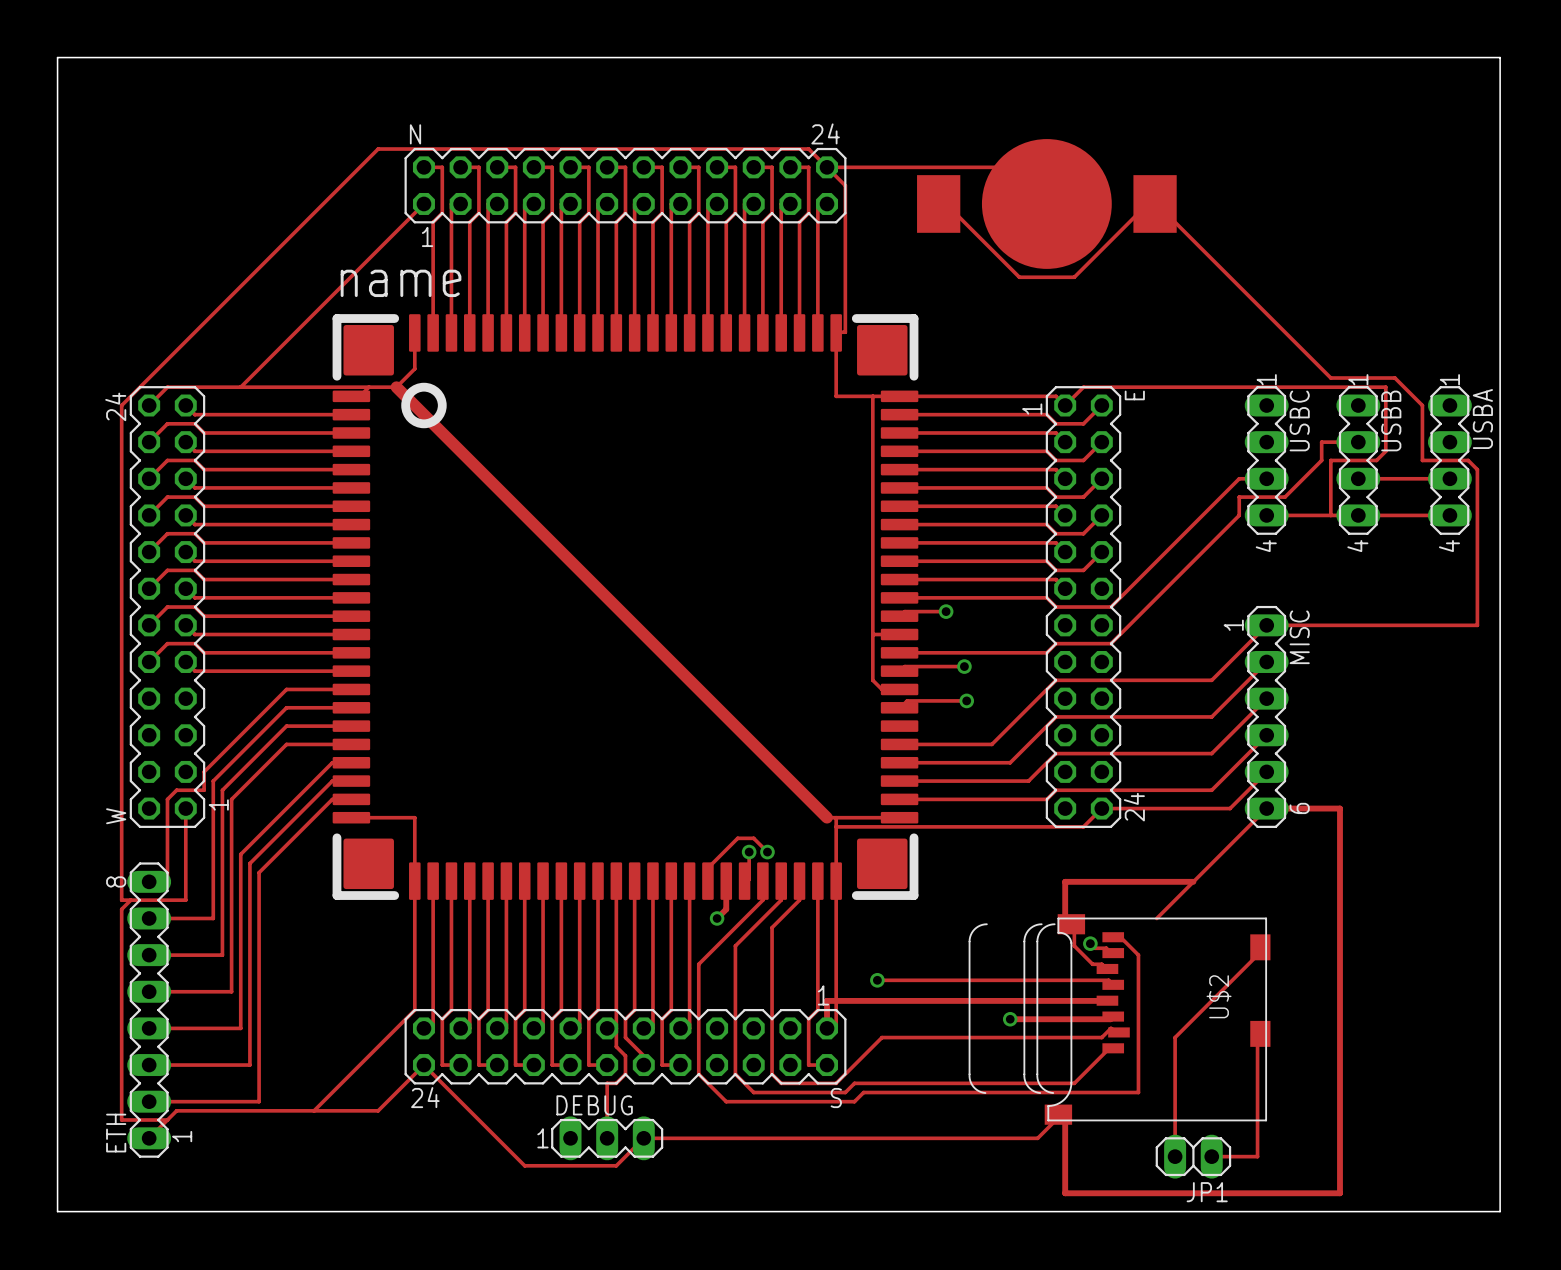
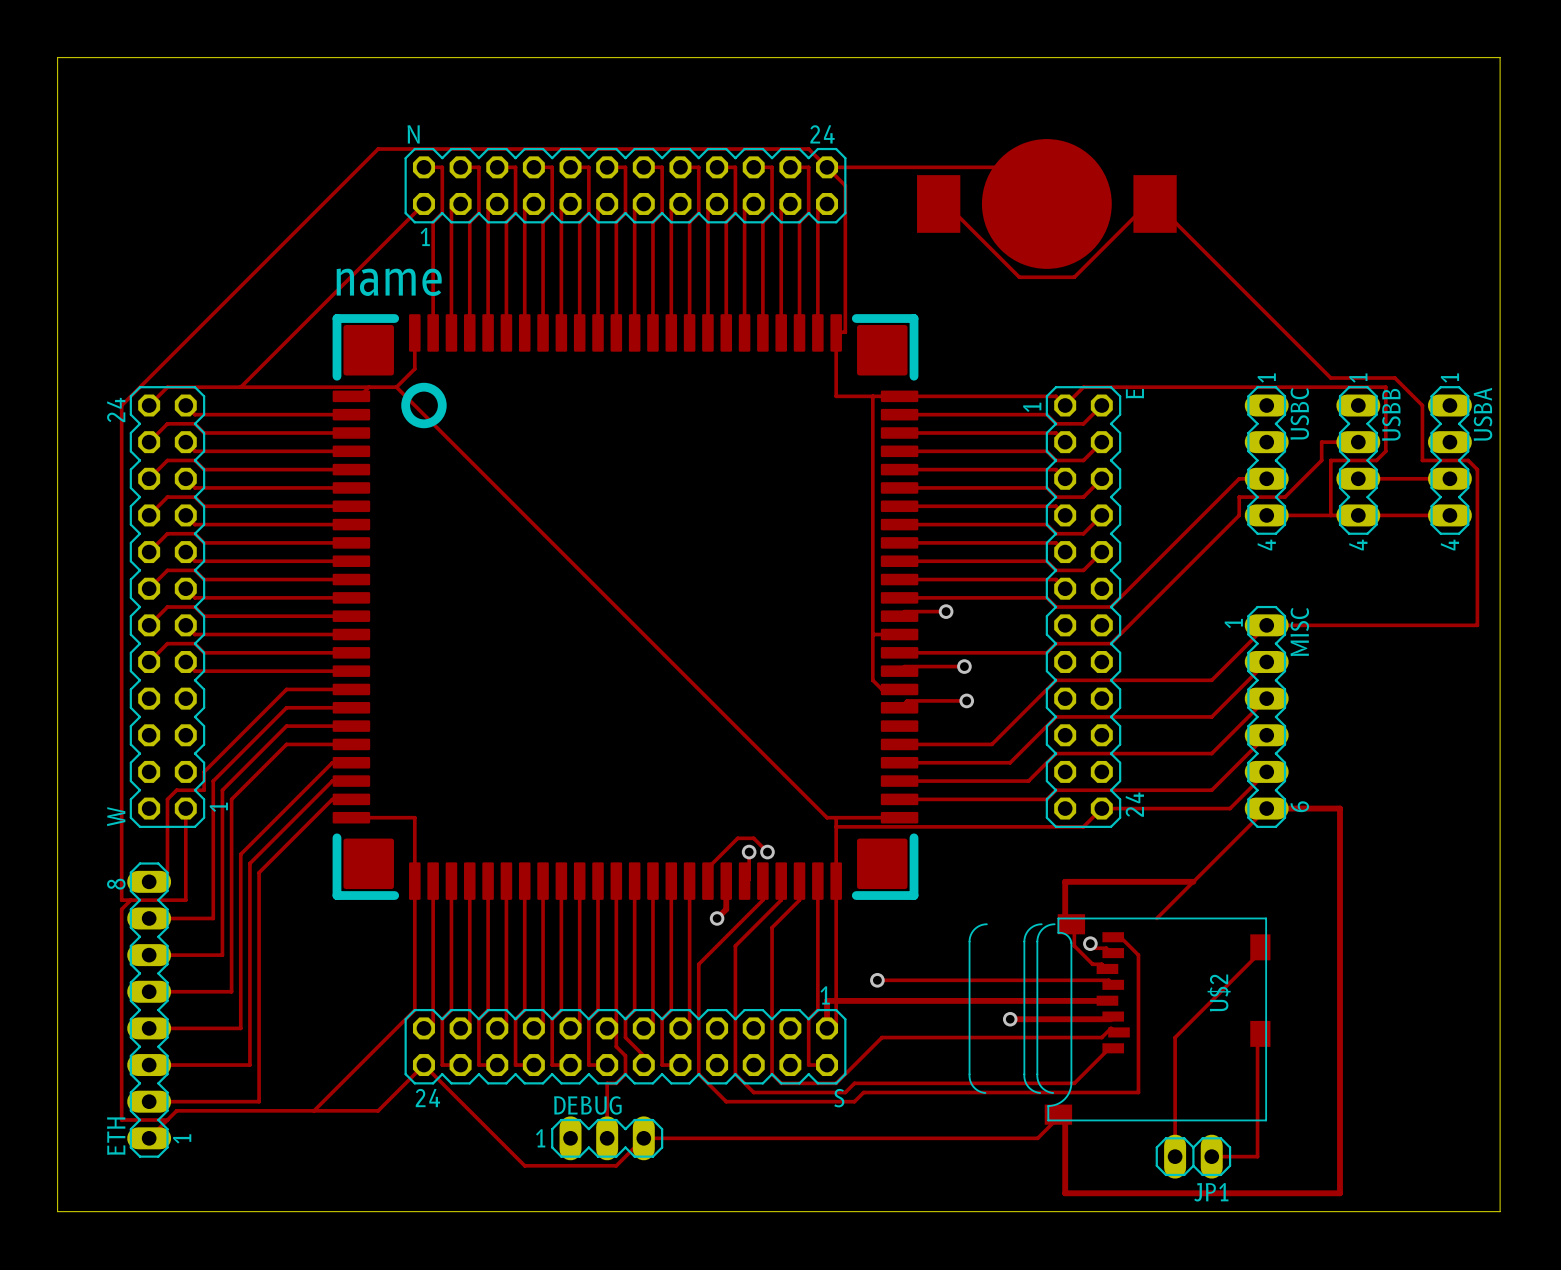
track width: thick (396, 387) (827, 817) -> thin (396, 387) (827, 817)

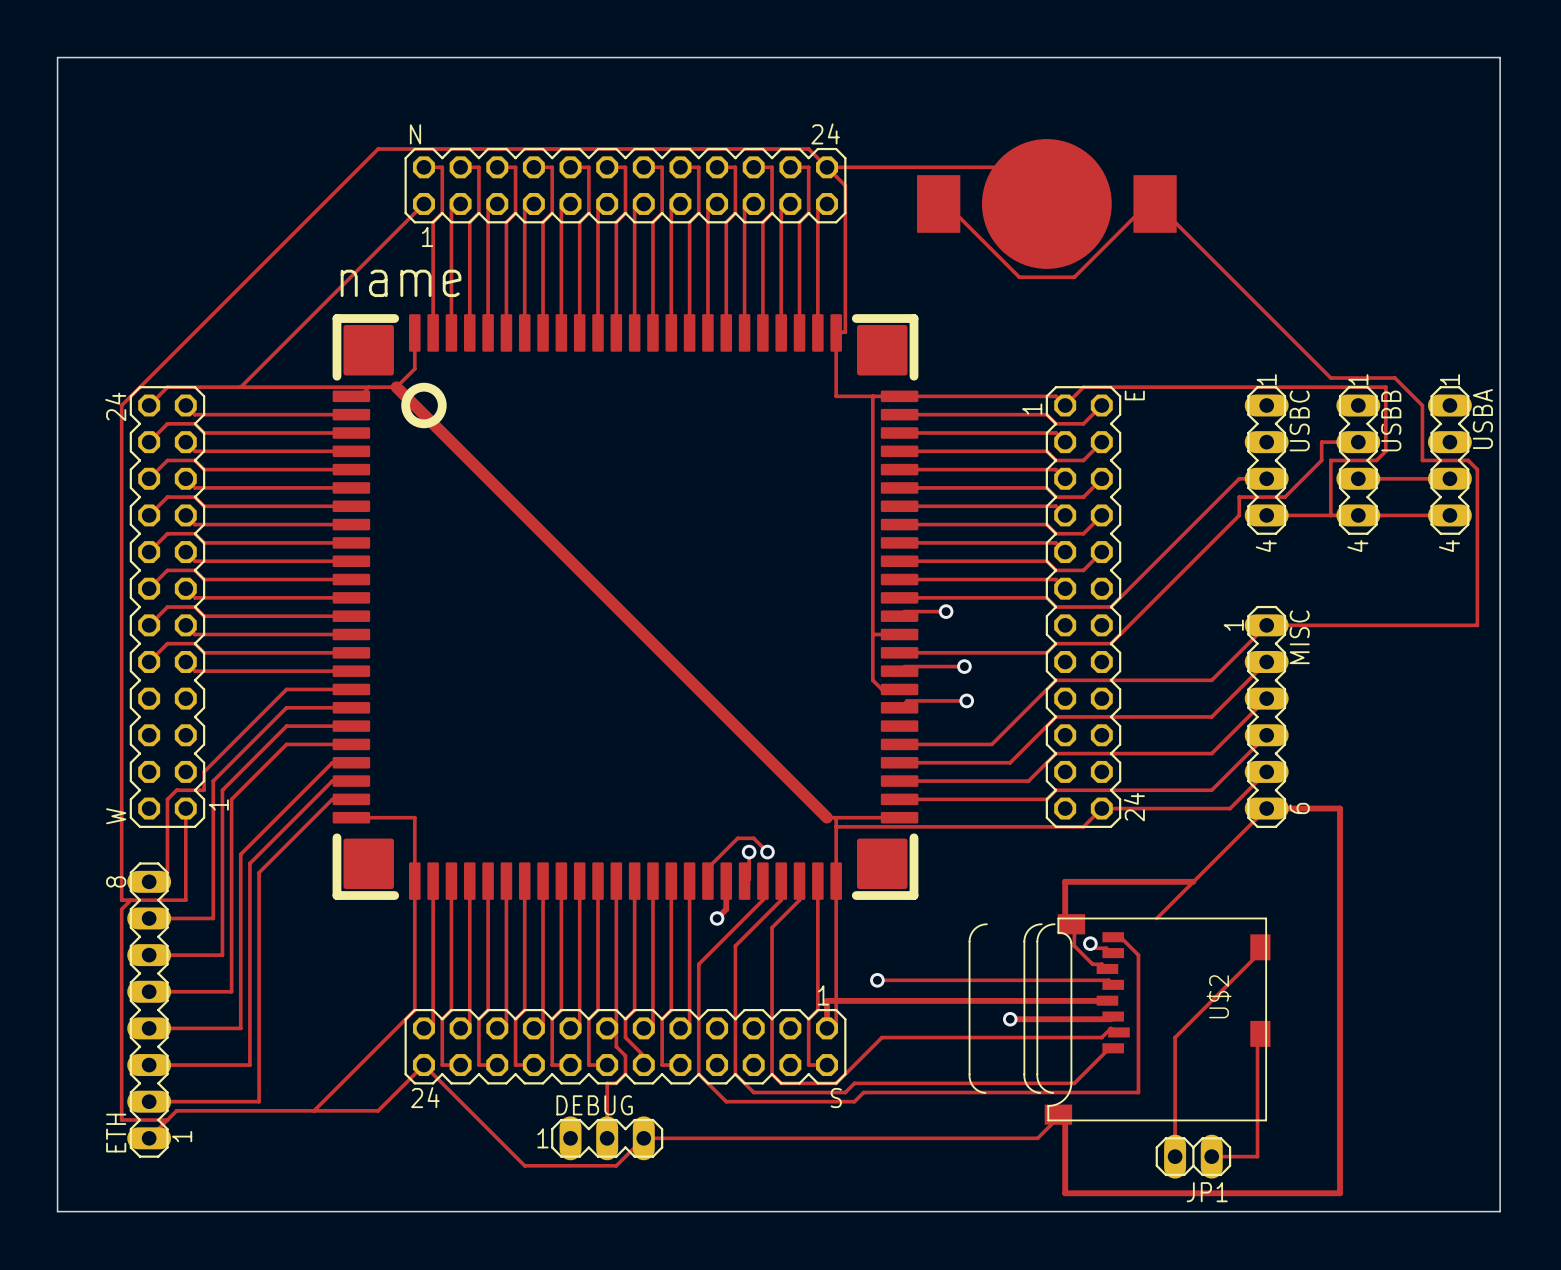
track width: thin (396, 387) (827, 817) -> thick (396, 387) (827, 817)

